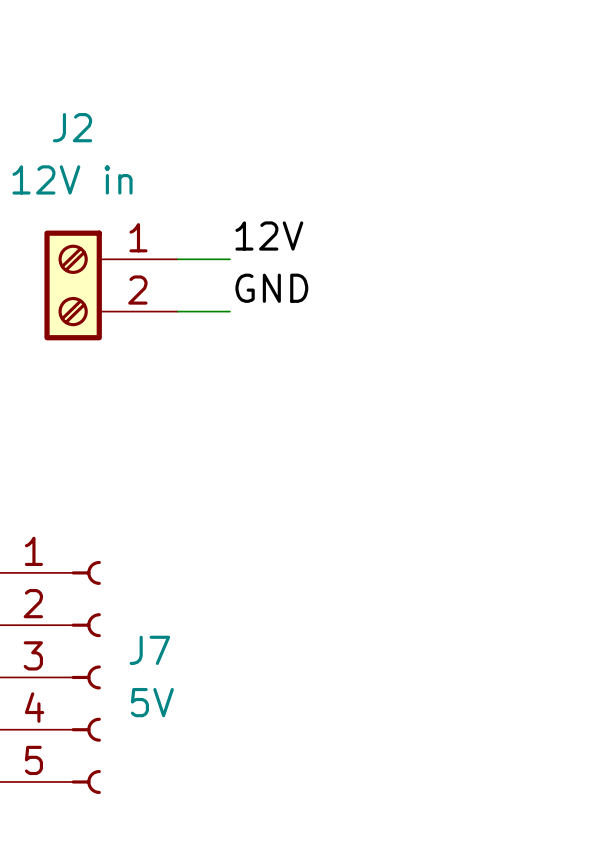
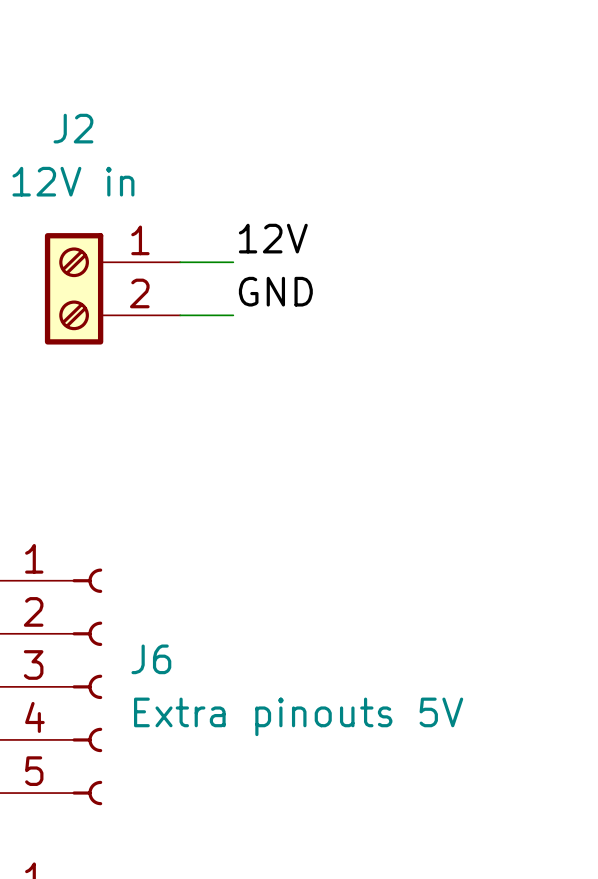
J7 name: J7 (149, 650) -> J6 (151, 659)
J7 value: 5V (152, 702) -> Extra pinouts 5V (298, 716)

